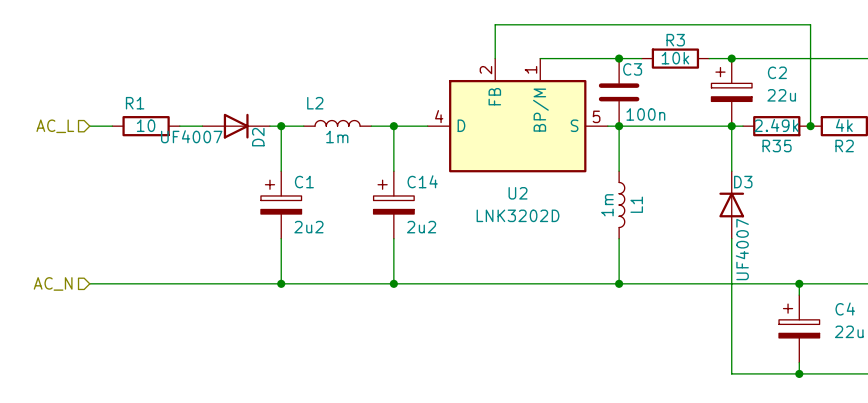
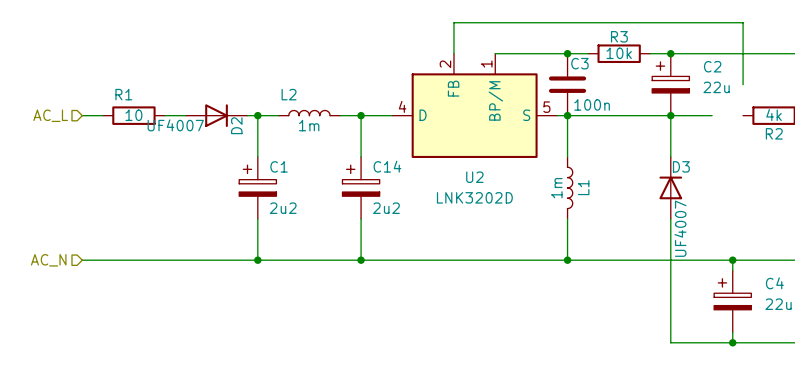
wire: (810, 92) (810, 126) -> none
wire: none -> (681, 115) (712, 115)
R35: 2.49k (776, 126) -> none
junction: (810, 126) -> none

